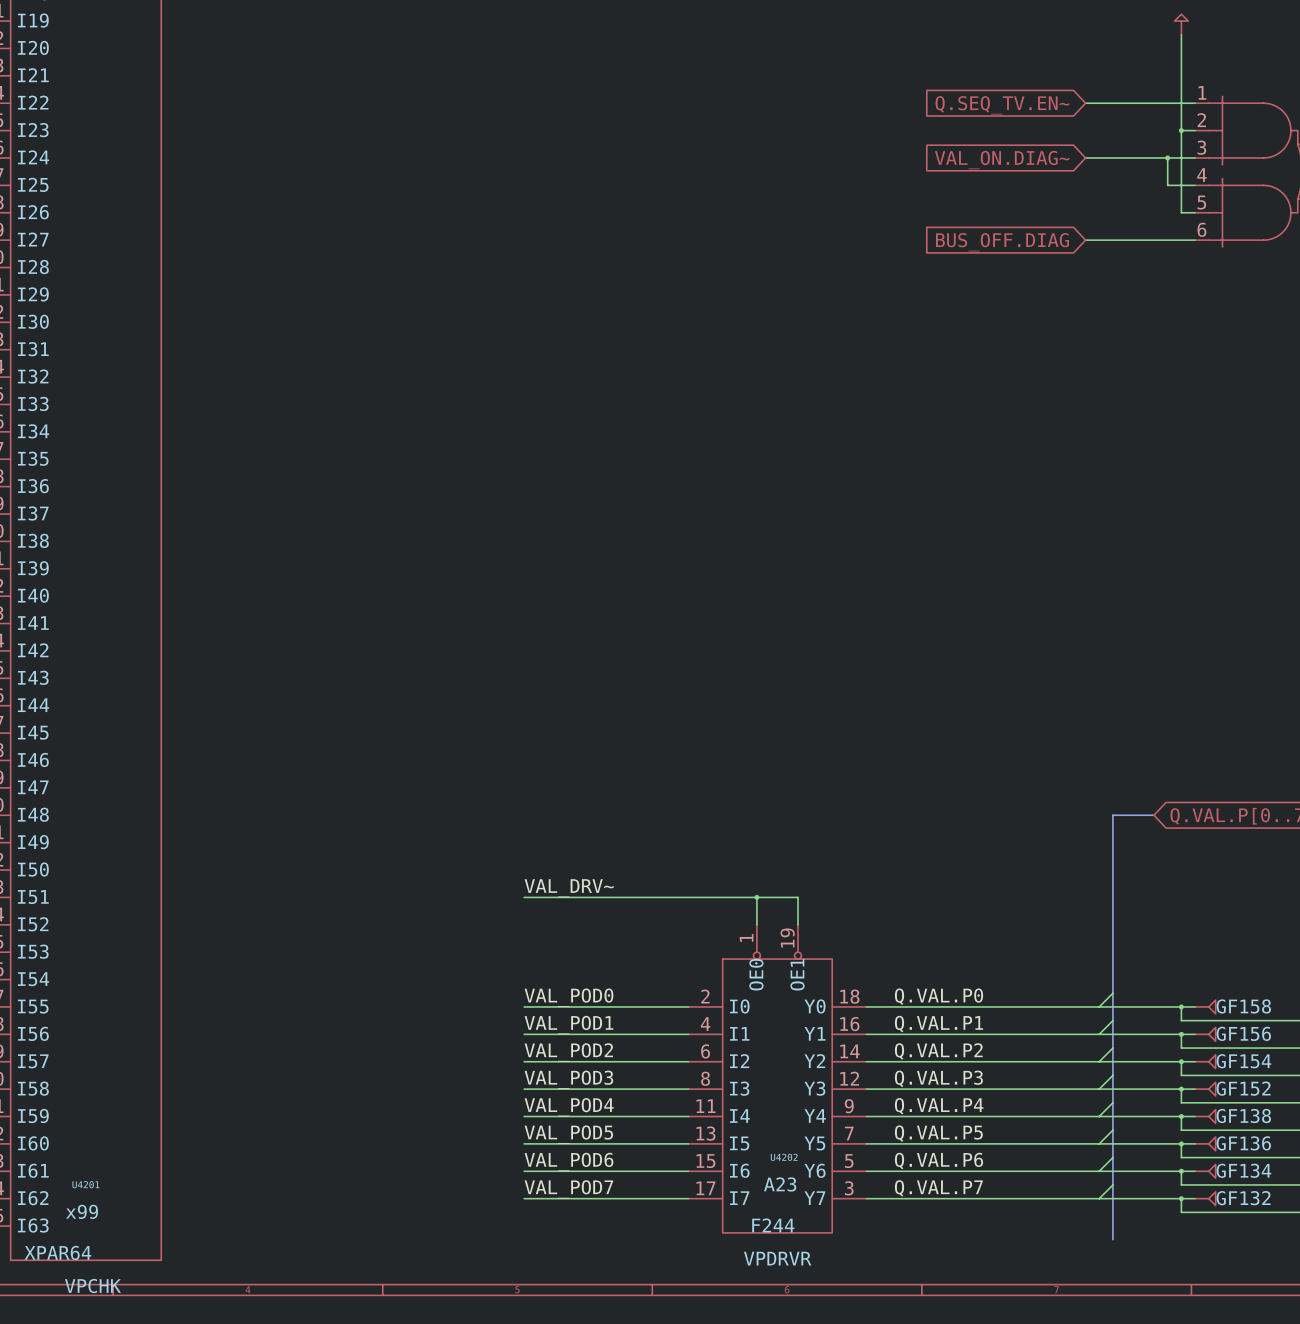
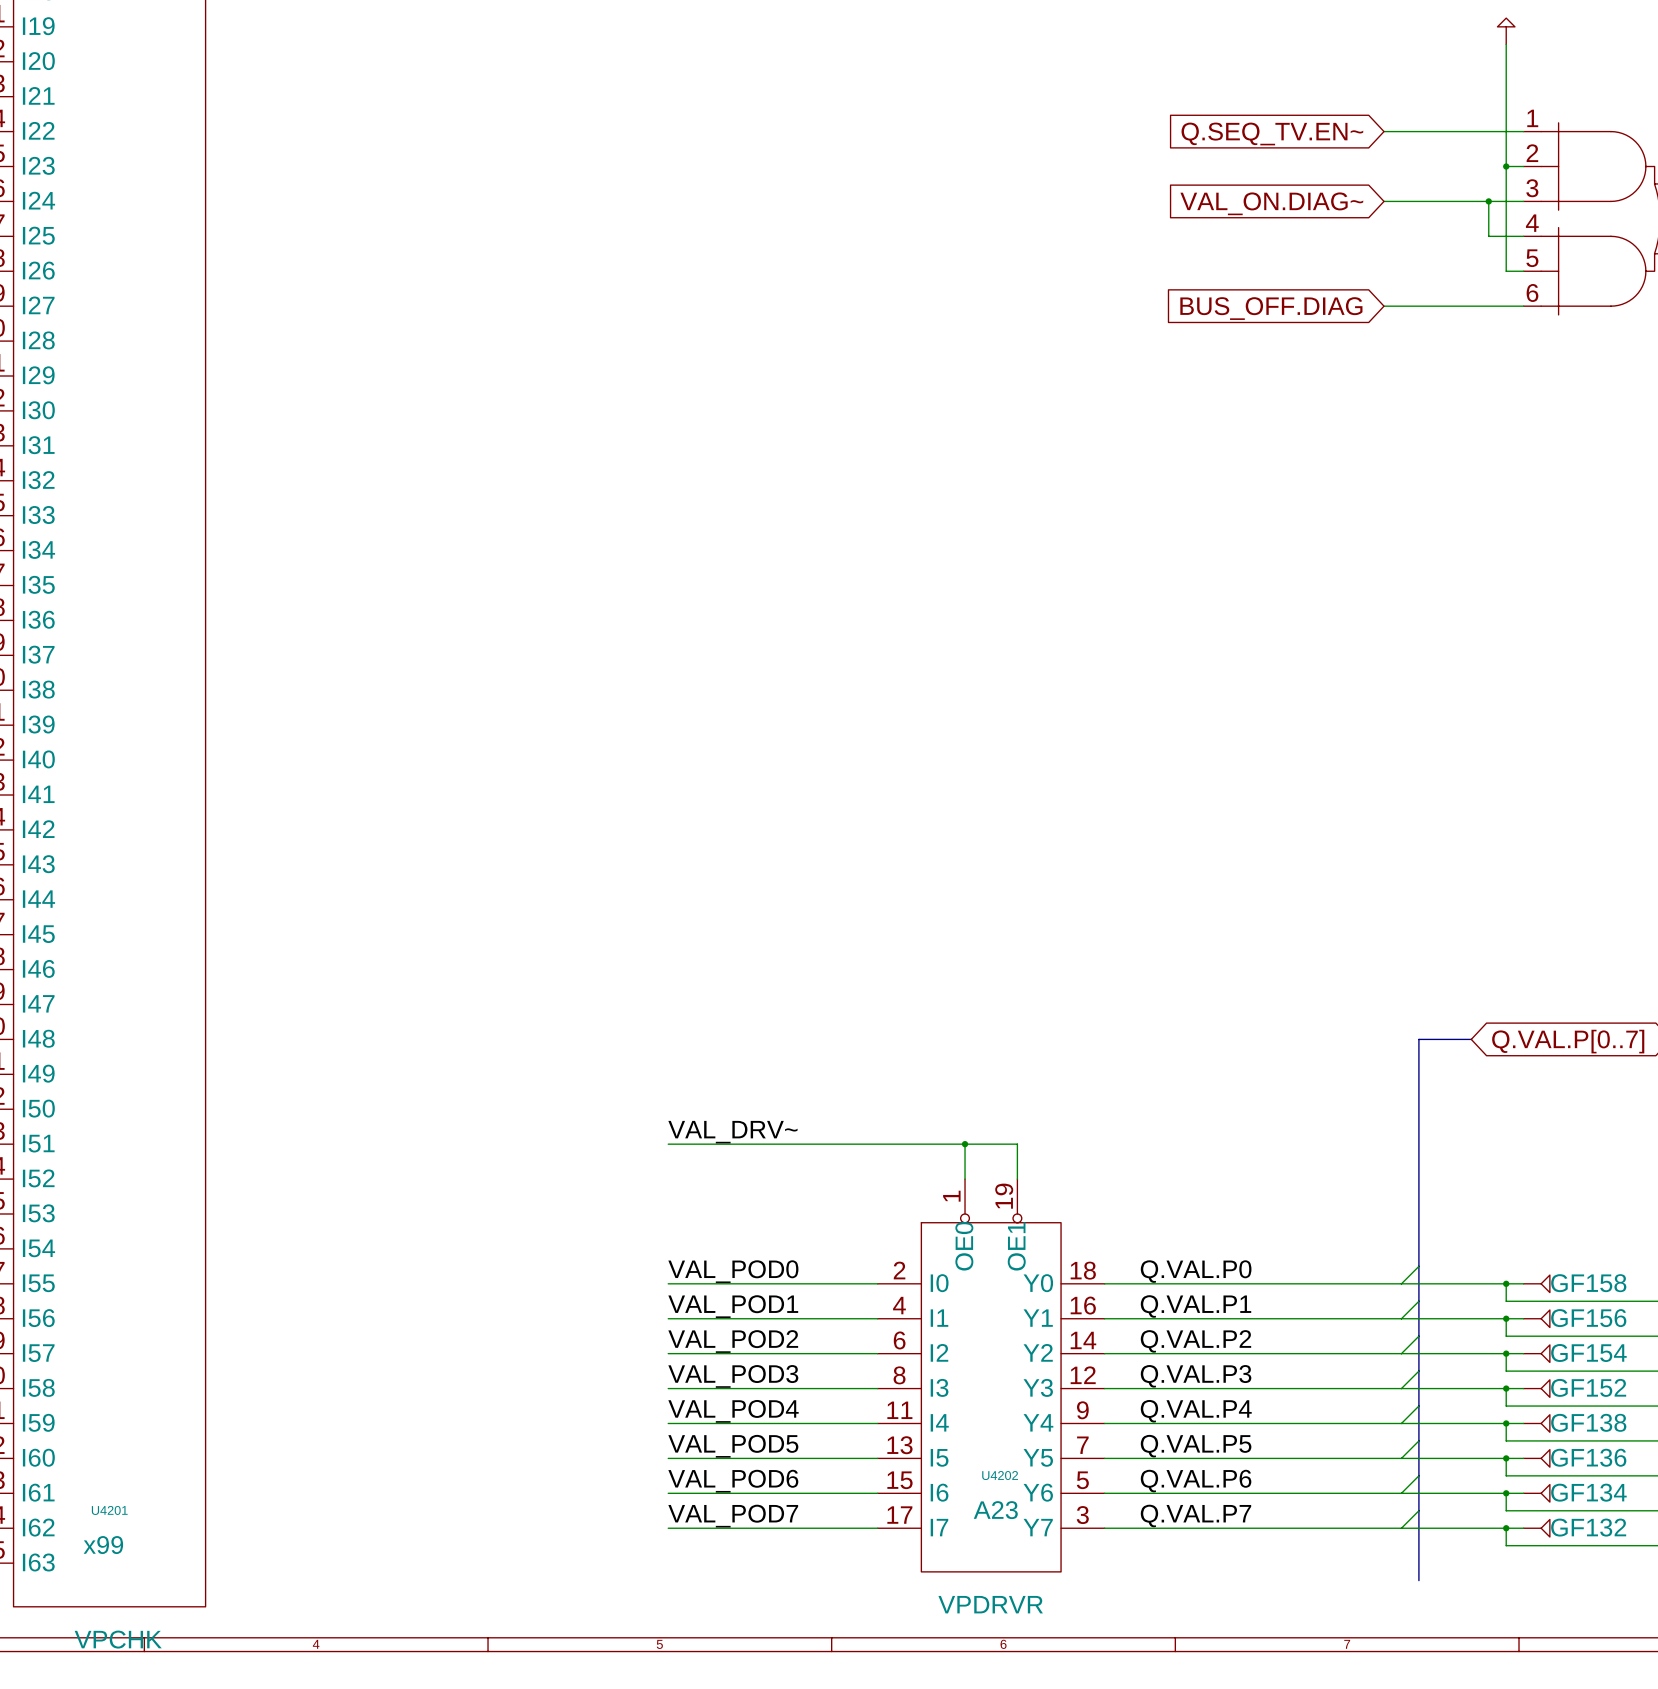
U4202 value: F244 (773, 1225) -> none
U4201 value: XPAR64 (57, 1252) -> none

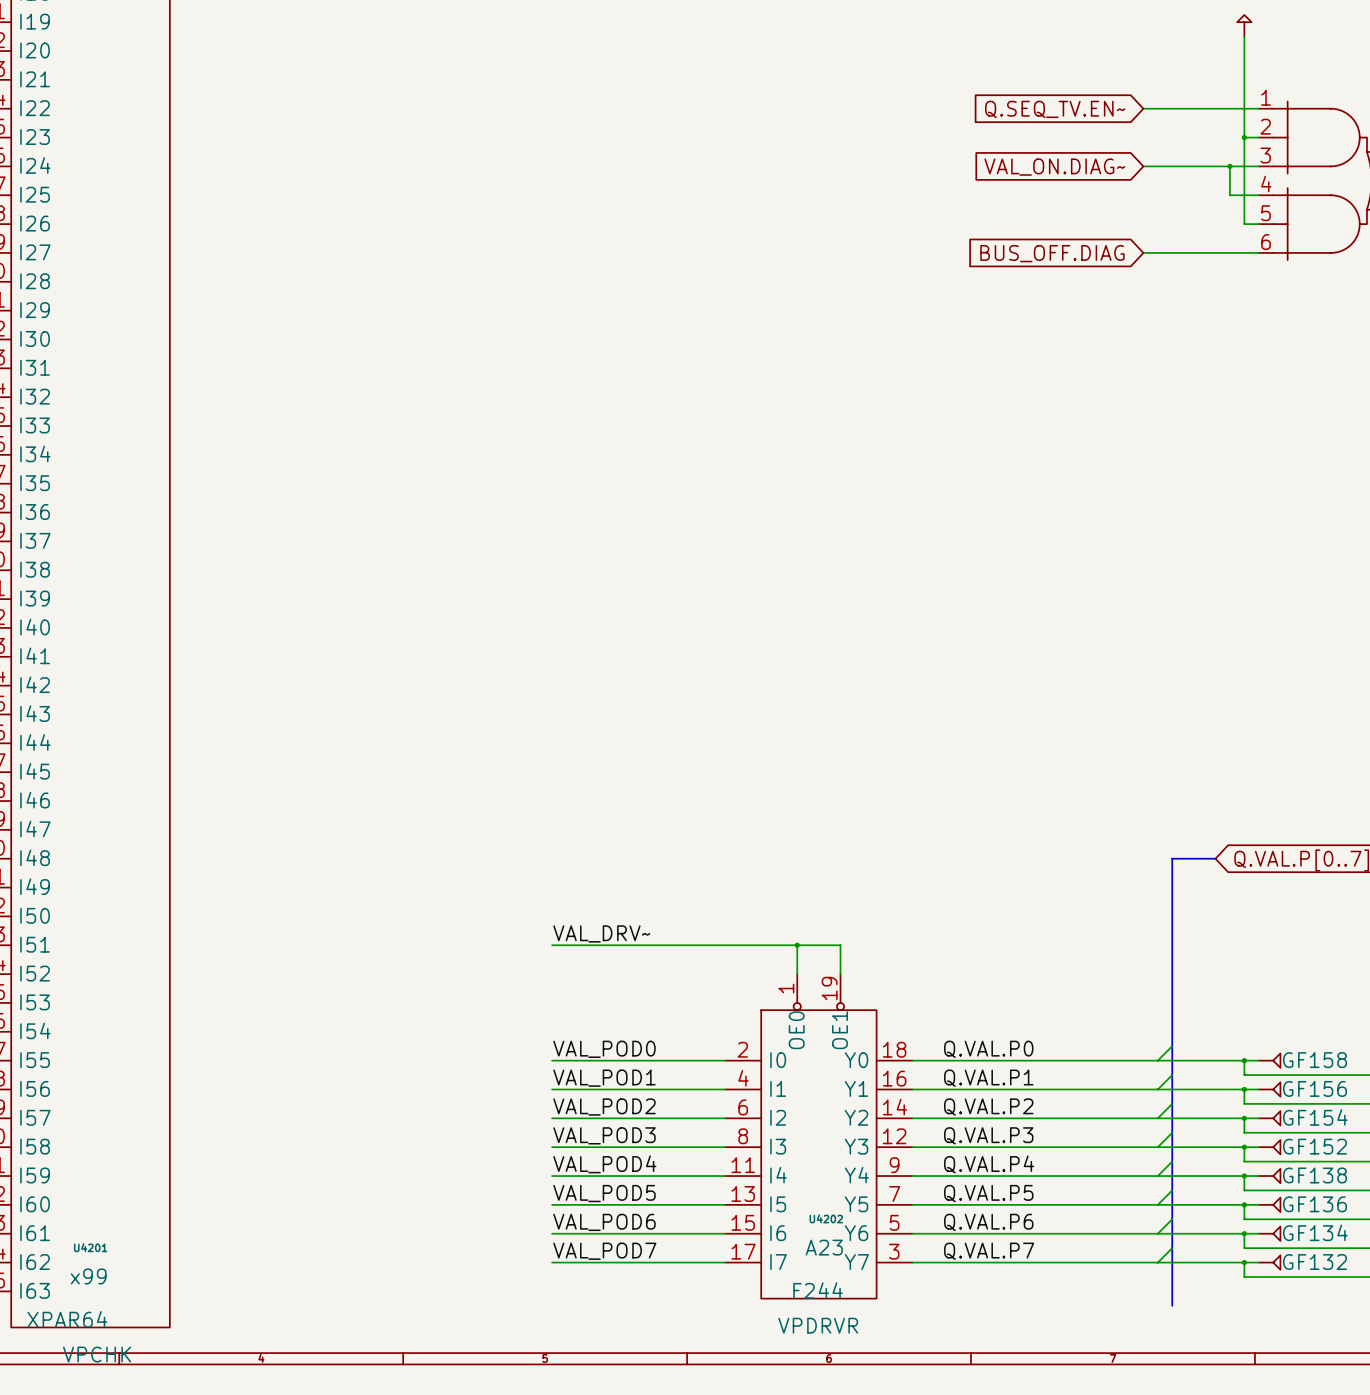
U4202 value: none -> F244 (818, 1290)
U4201 value: none -> XPAR64 (67, 1319)

